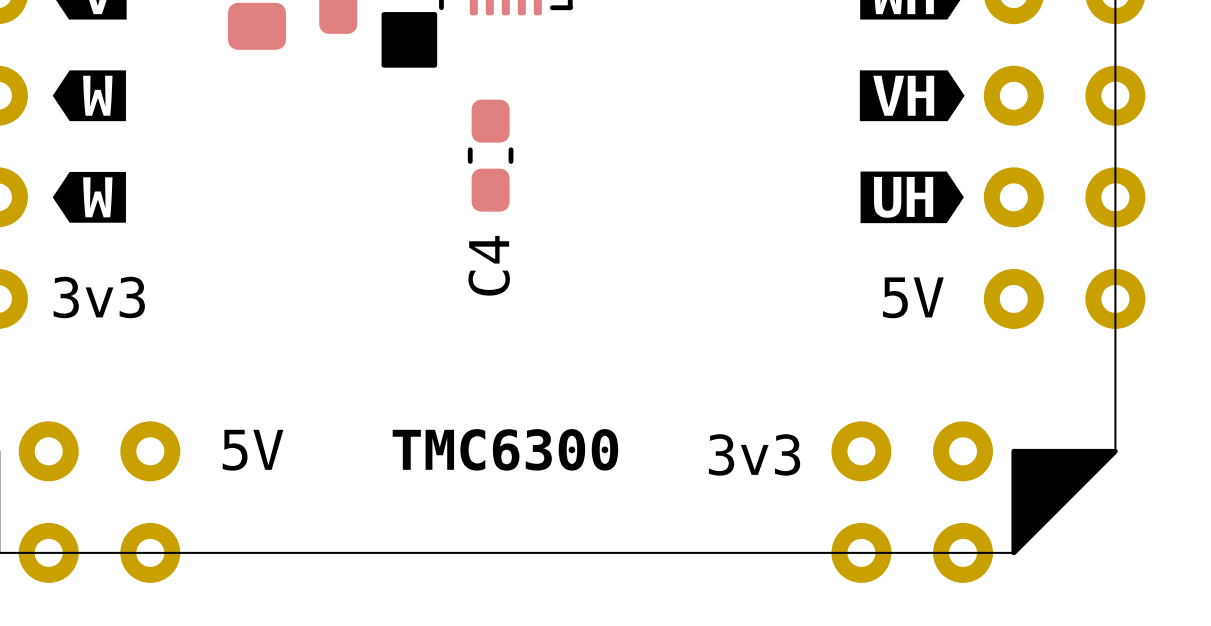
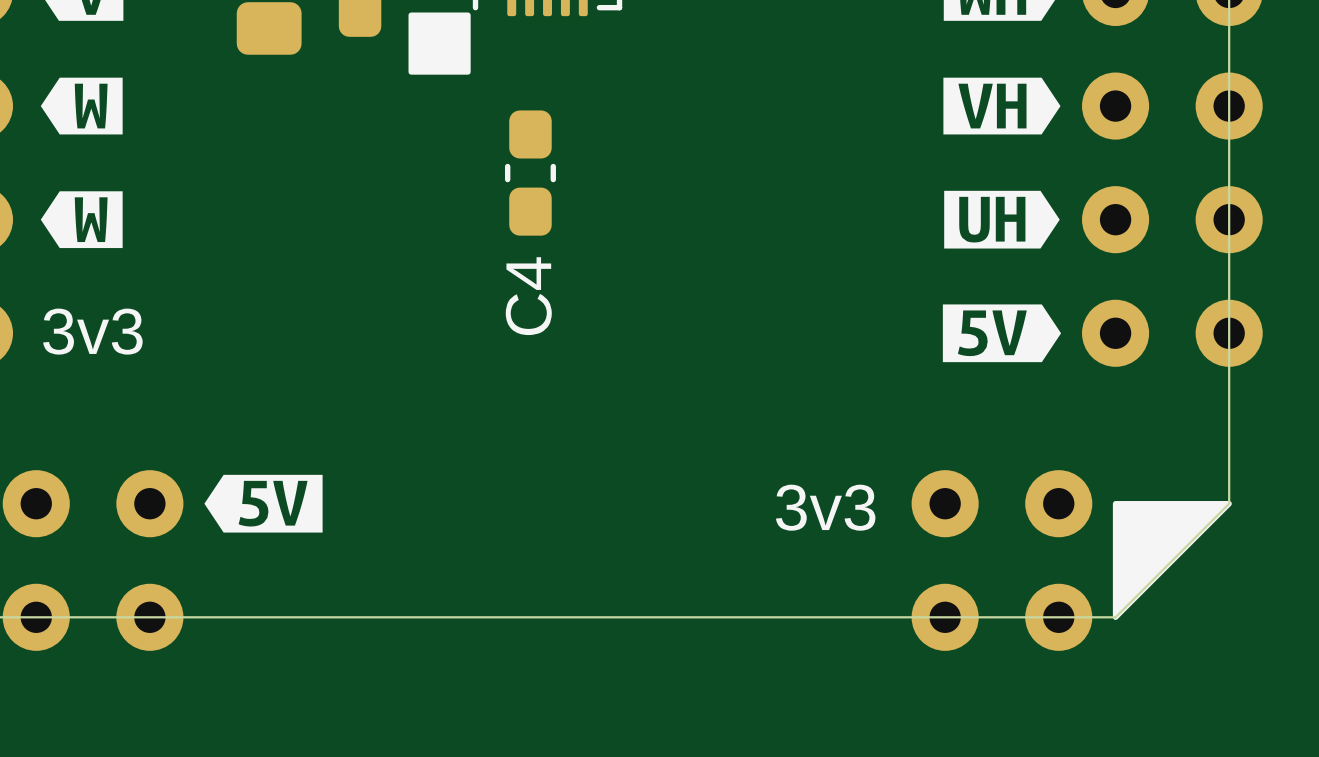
drawing: none -> [942, 304, 1062, 363]
text: 5V (913, 297) -> none
drawing: none -> [204, 474, 323, 533]
text: TMC6300 (505, 449) -> none
text: 5V (253, 450) -> none

